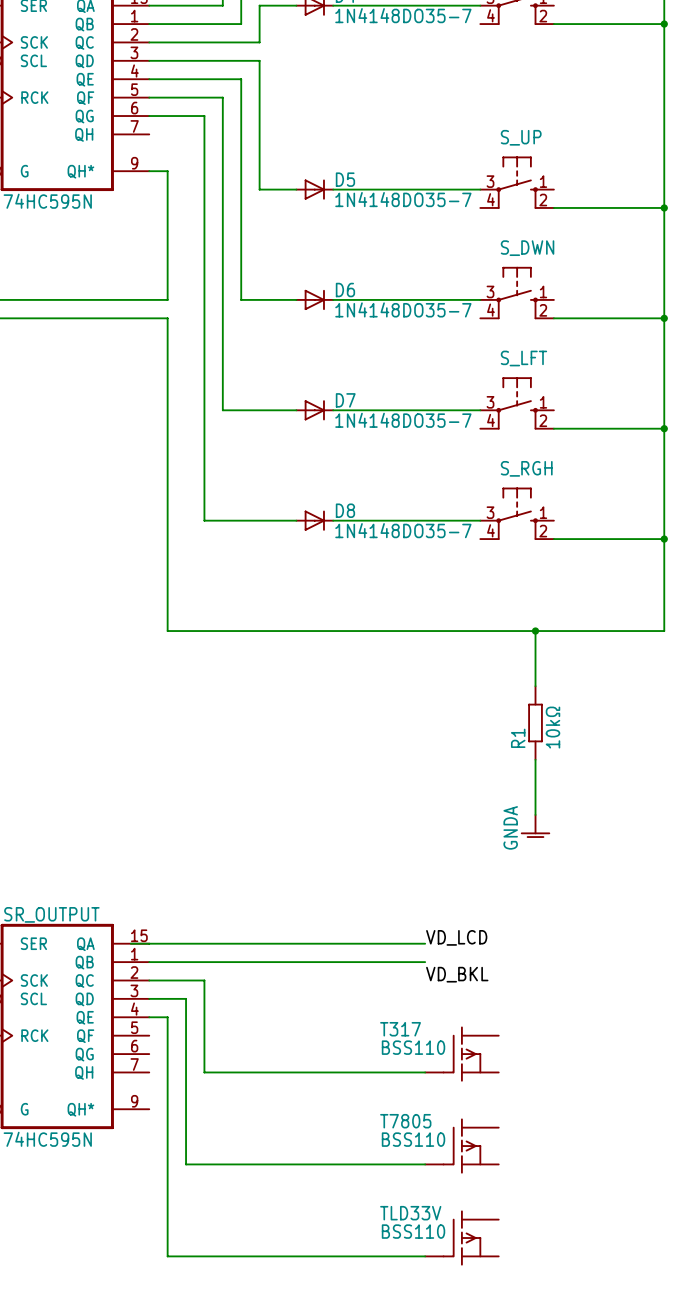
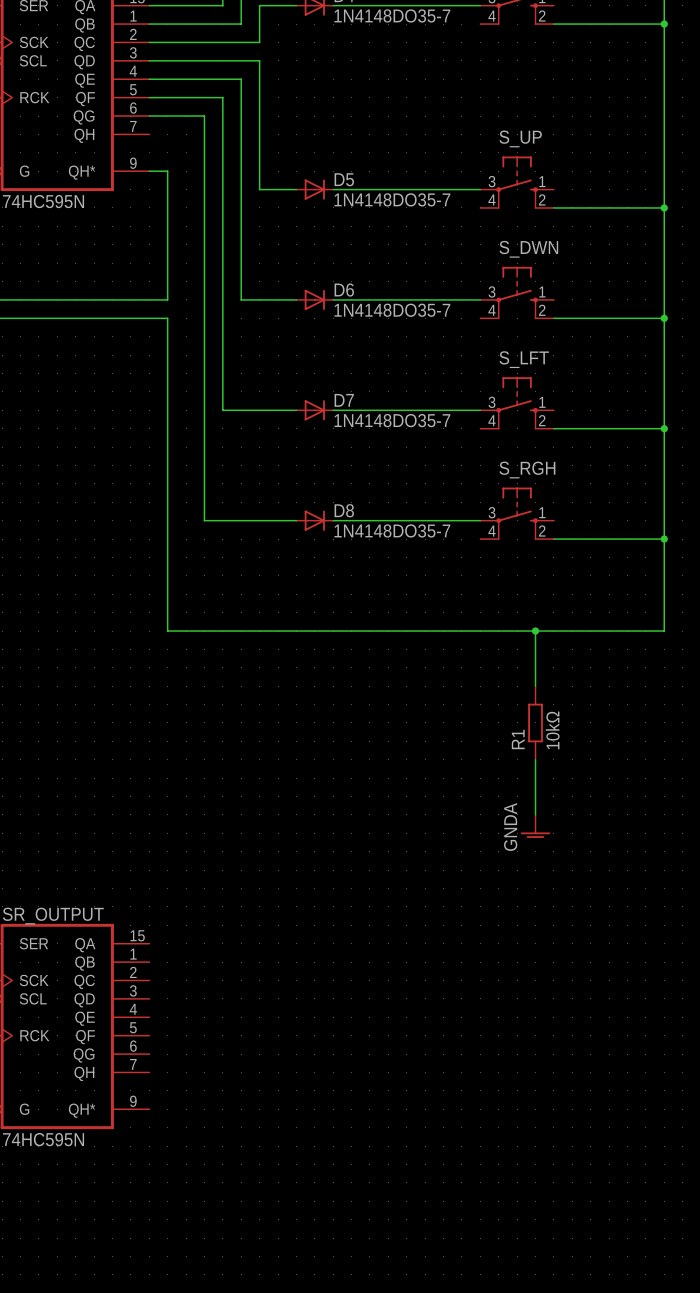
label: VD_LCD (456, 937) -> none
wire: (130, 943) (425, 943) -> none
wire: (149, 962) (425, 962) -> none
label: VD_BKL (457, 974) -> none
wire: (149, 980) (204, 980) (204, 1072) (425, 1072) -> none
wire: (149, 998) (186, 998) (186, 1164) (425, 1164) -> none
wire: (149, 1017) (167, 1017) (167, 1256) (425, 1256) -> none
T317: BSS110 (461, 1054) -> none
T7805: BSS110 (461, 1146) -> none
TLD33V: BSS110 (461, 1238) -> none

